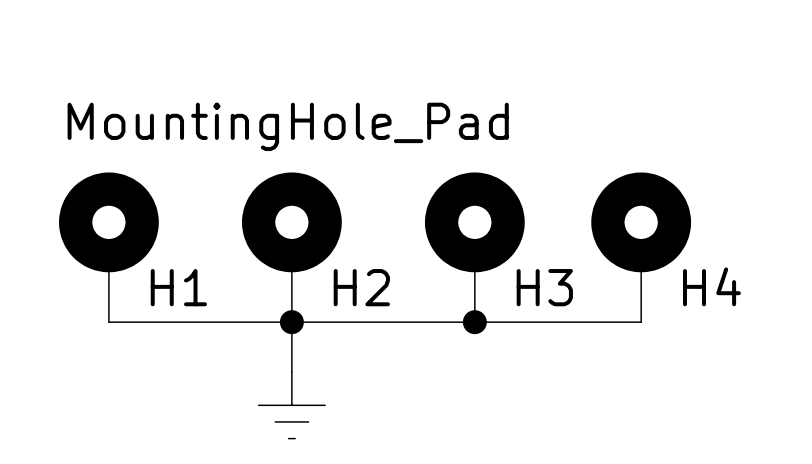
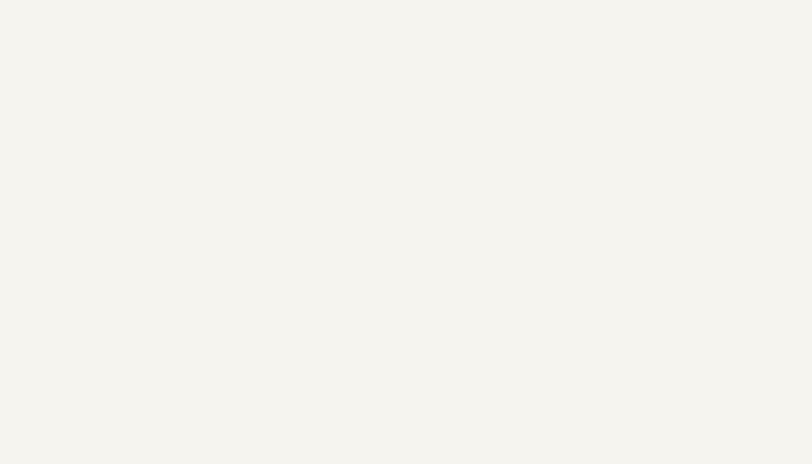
H1: MountingHole_Pad (108, 247) -> none
H2: (291, 247) -> none
H3: (474, 247) -> none
H4: (641, 247) -> none
wire: (108, 322) (641, 322) -> none
wire: (291, 322) (291, 372) -> none
junction: (291, 322) -> none
junction: (474, 322) -> none
power symbol: (291, 405) -> none

